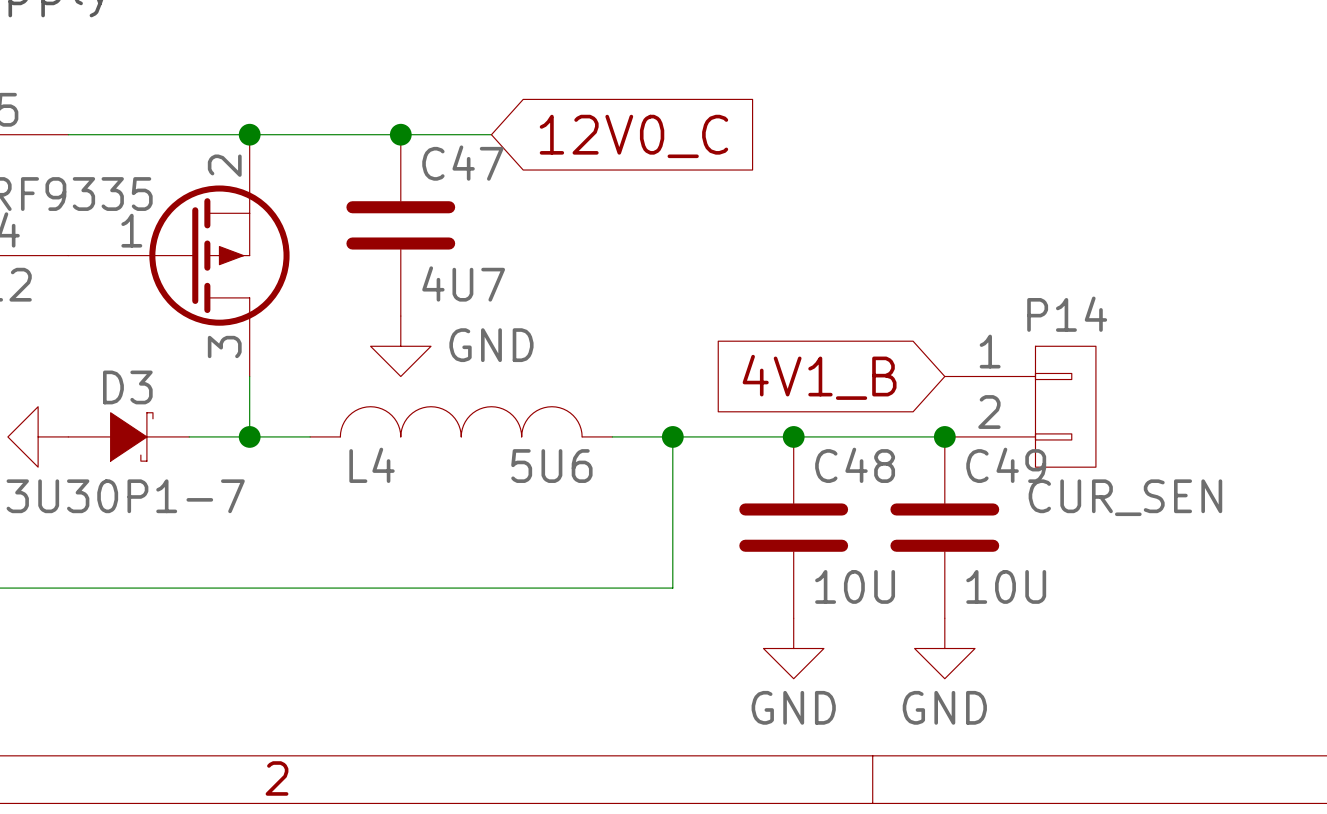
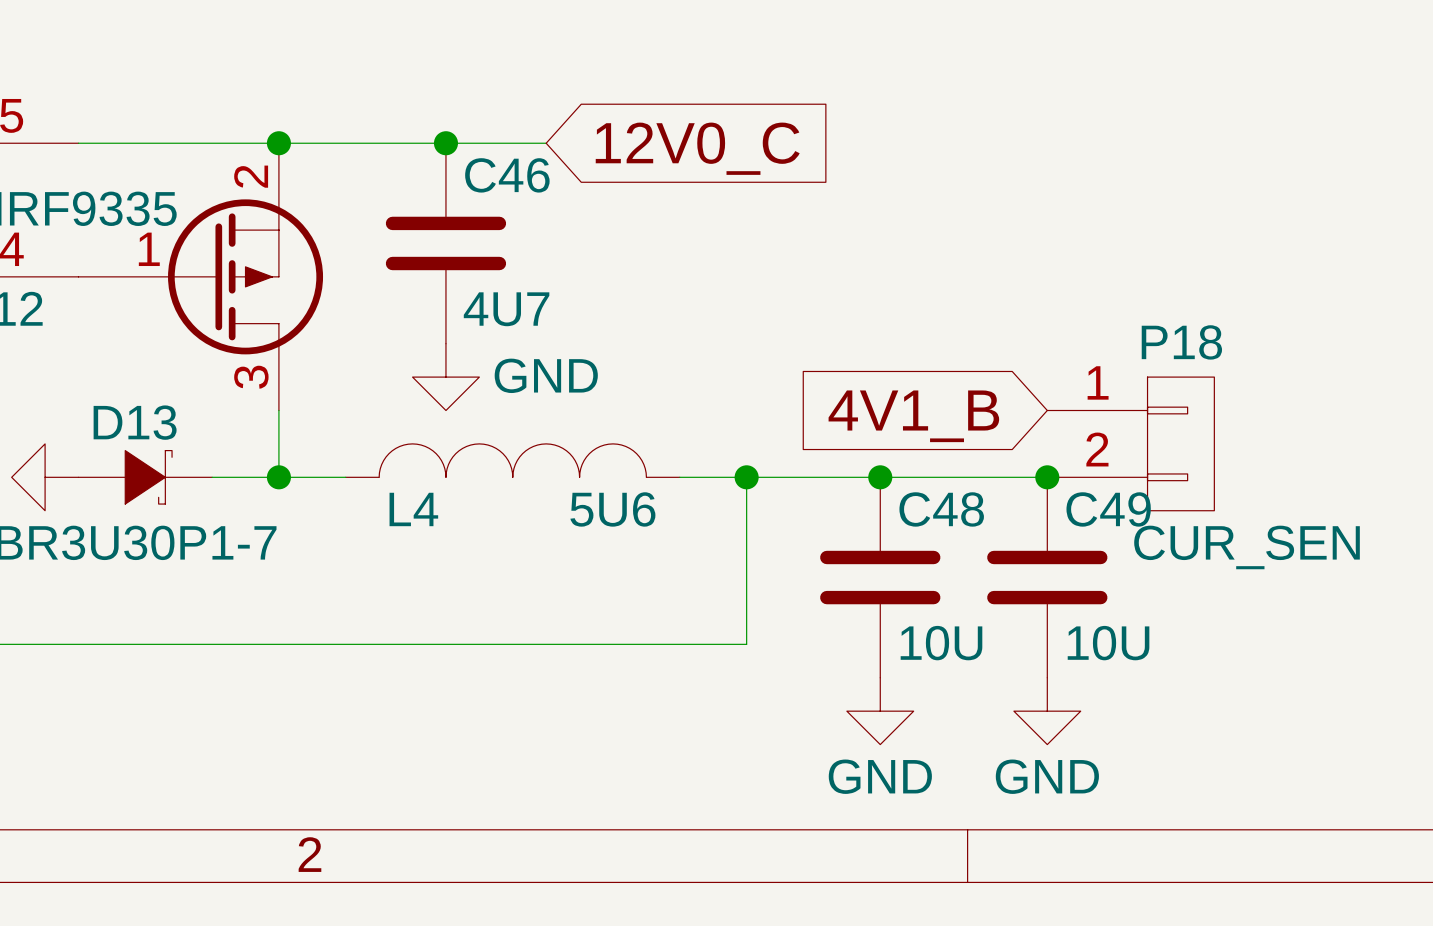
C47 name: C47 (462, 163) -> C46 (507, 175)
P14 name: P14 (1067, 314) -> P18 (1181, 342)
D3 name: D3 (127, 387) -> D13 (135, 422)

